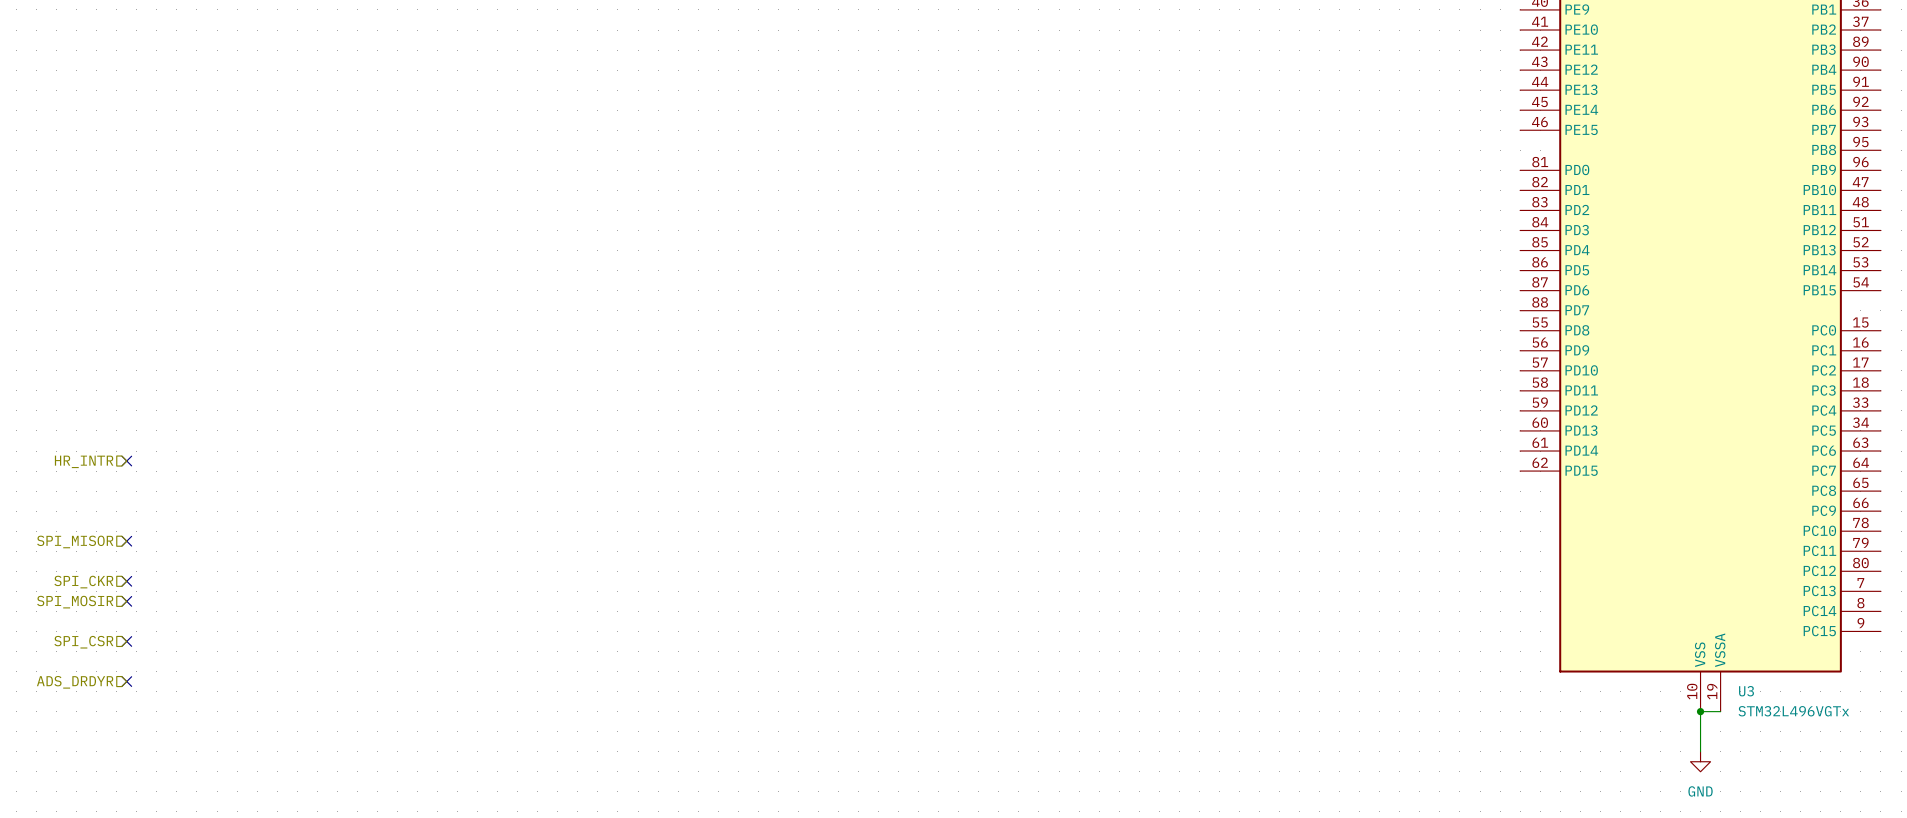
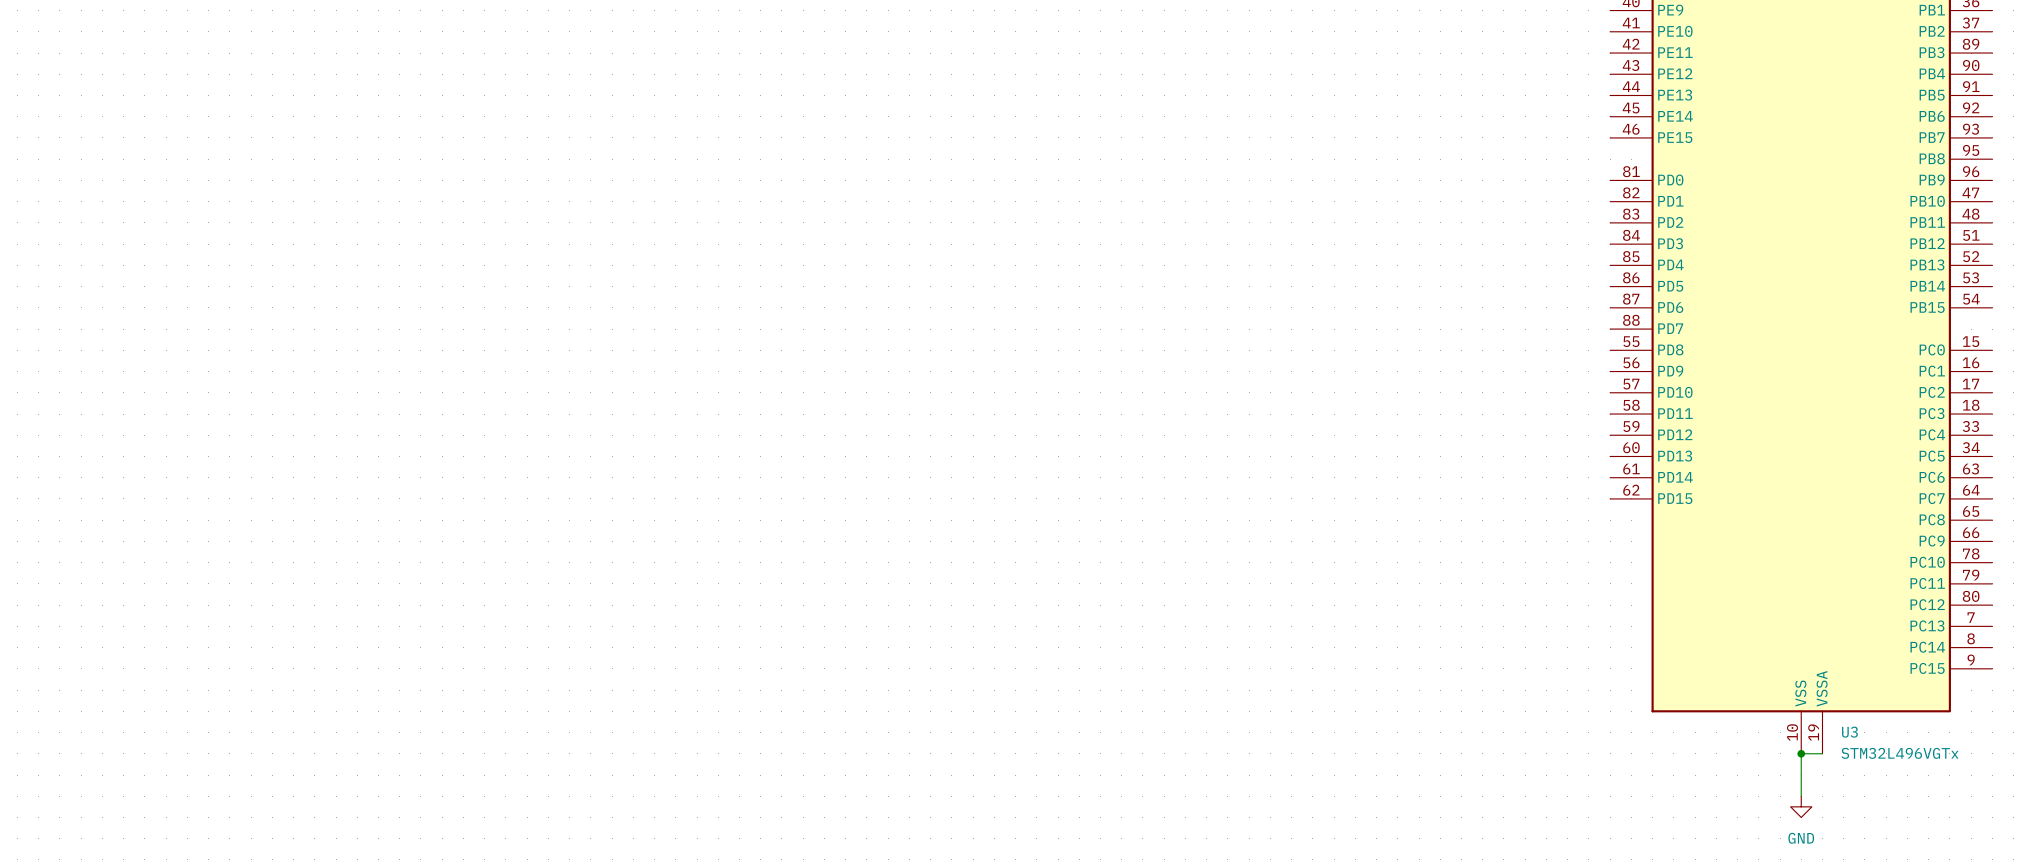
hierarchical label: HR_INTR (84, 461) -> none
no-connect mark: (126, 461) -> none
hierarchical label: SPI_MISOR (75, 541) -> none
no-connect mark: (126, 541) -> none
no-connect mark: (126, 581) -> none
hierarchical label: SPI_CKR (83, 582) -> none
no-connect mark: (126, 601) -> none
hierarchical label: SPI_MOSIR (75, 602) -> none
no-connect mark: (126, 641) -> none
hierarchical label: SPI_CSR (83, 642) -> none
no-connect mark: (126, 681) -> none
hierarchical label: ADS_DRDYR (75, 682) -> none

